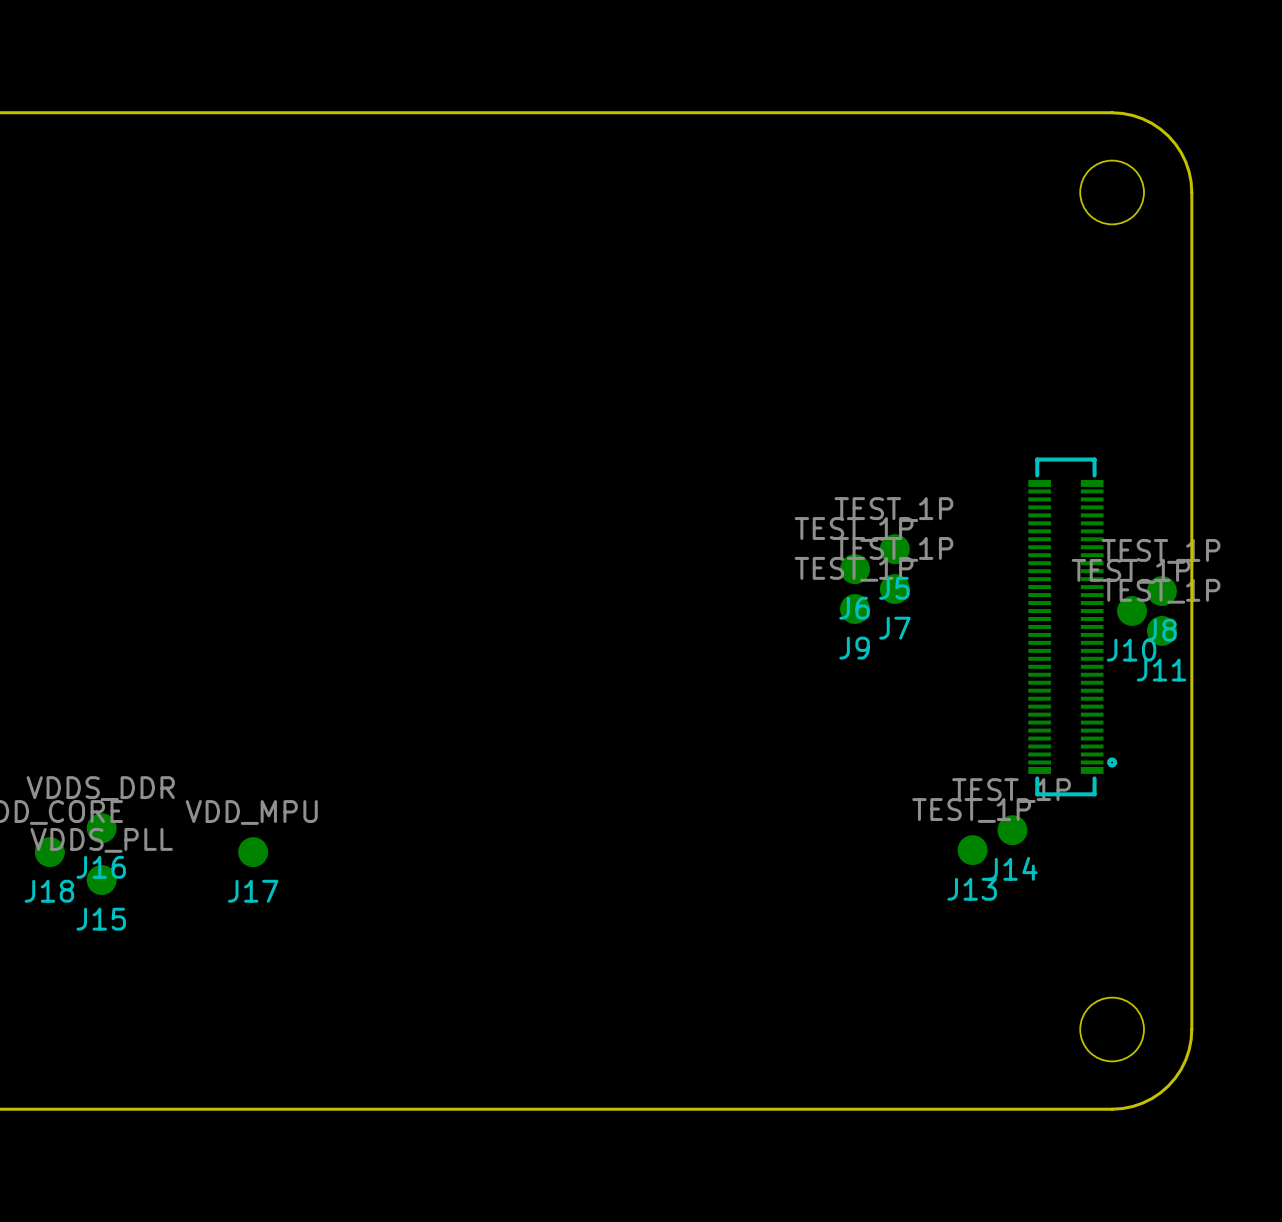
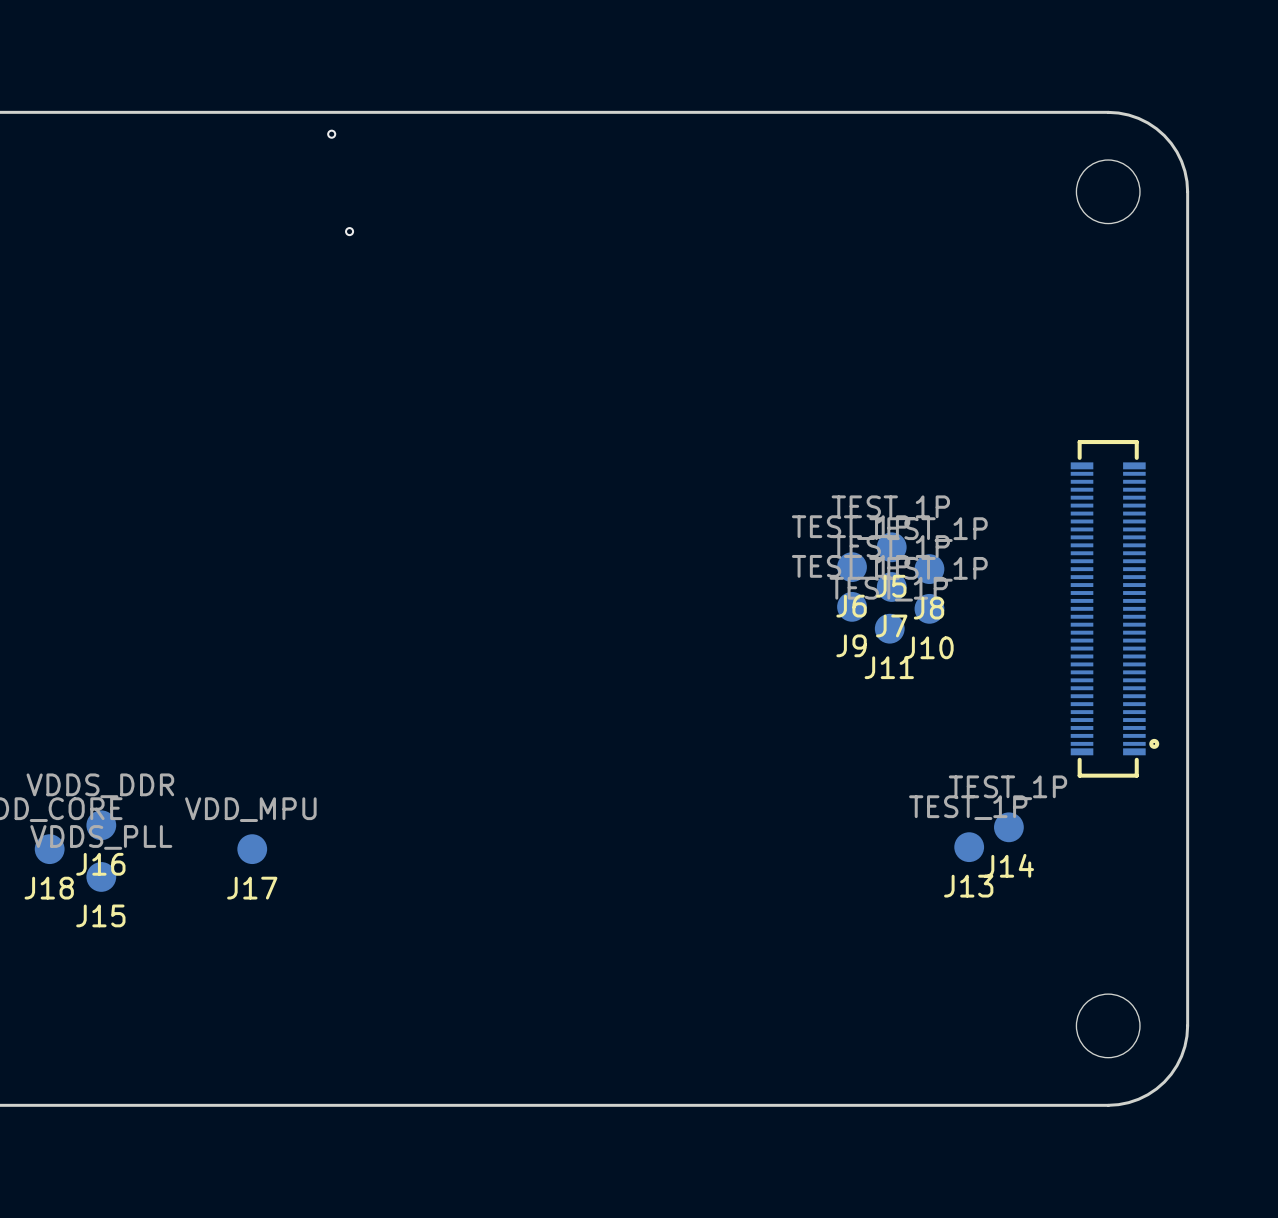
via: none -> (331, 134)
via: none -> (349, 231)
J8 position: (1161, 591) -> (929, 569)
J10 position: (1132, 610) -> (929, 608)
part position: (1072, 626) -> (1114, 608)
J11 position: (1161, 630) -> (889, 628)

